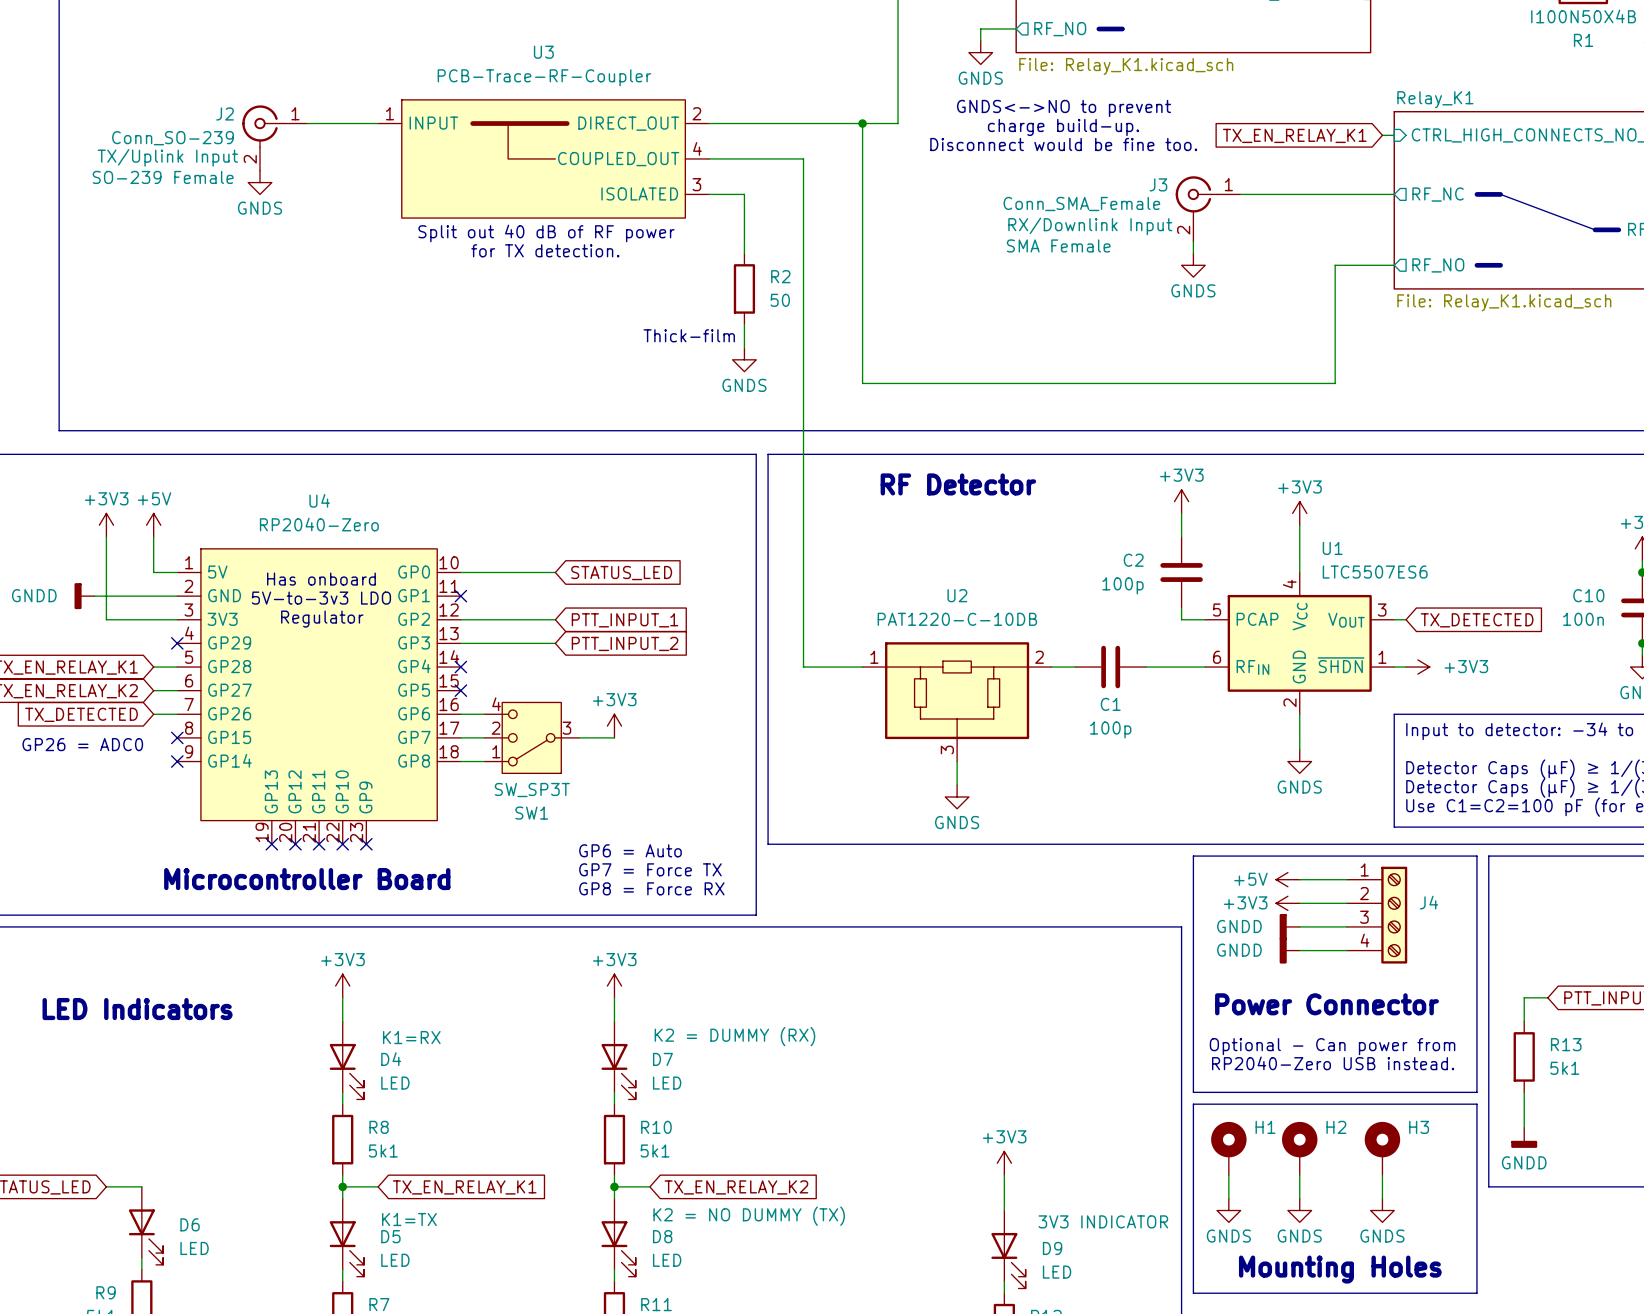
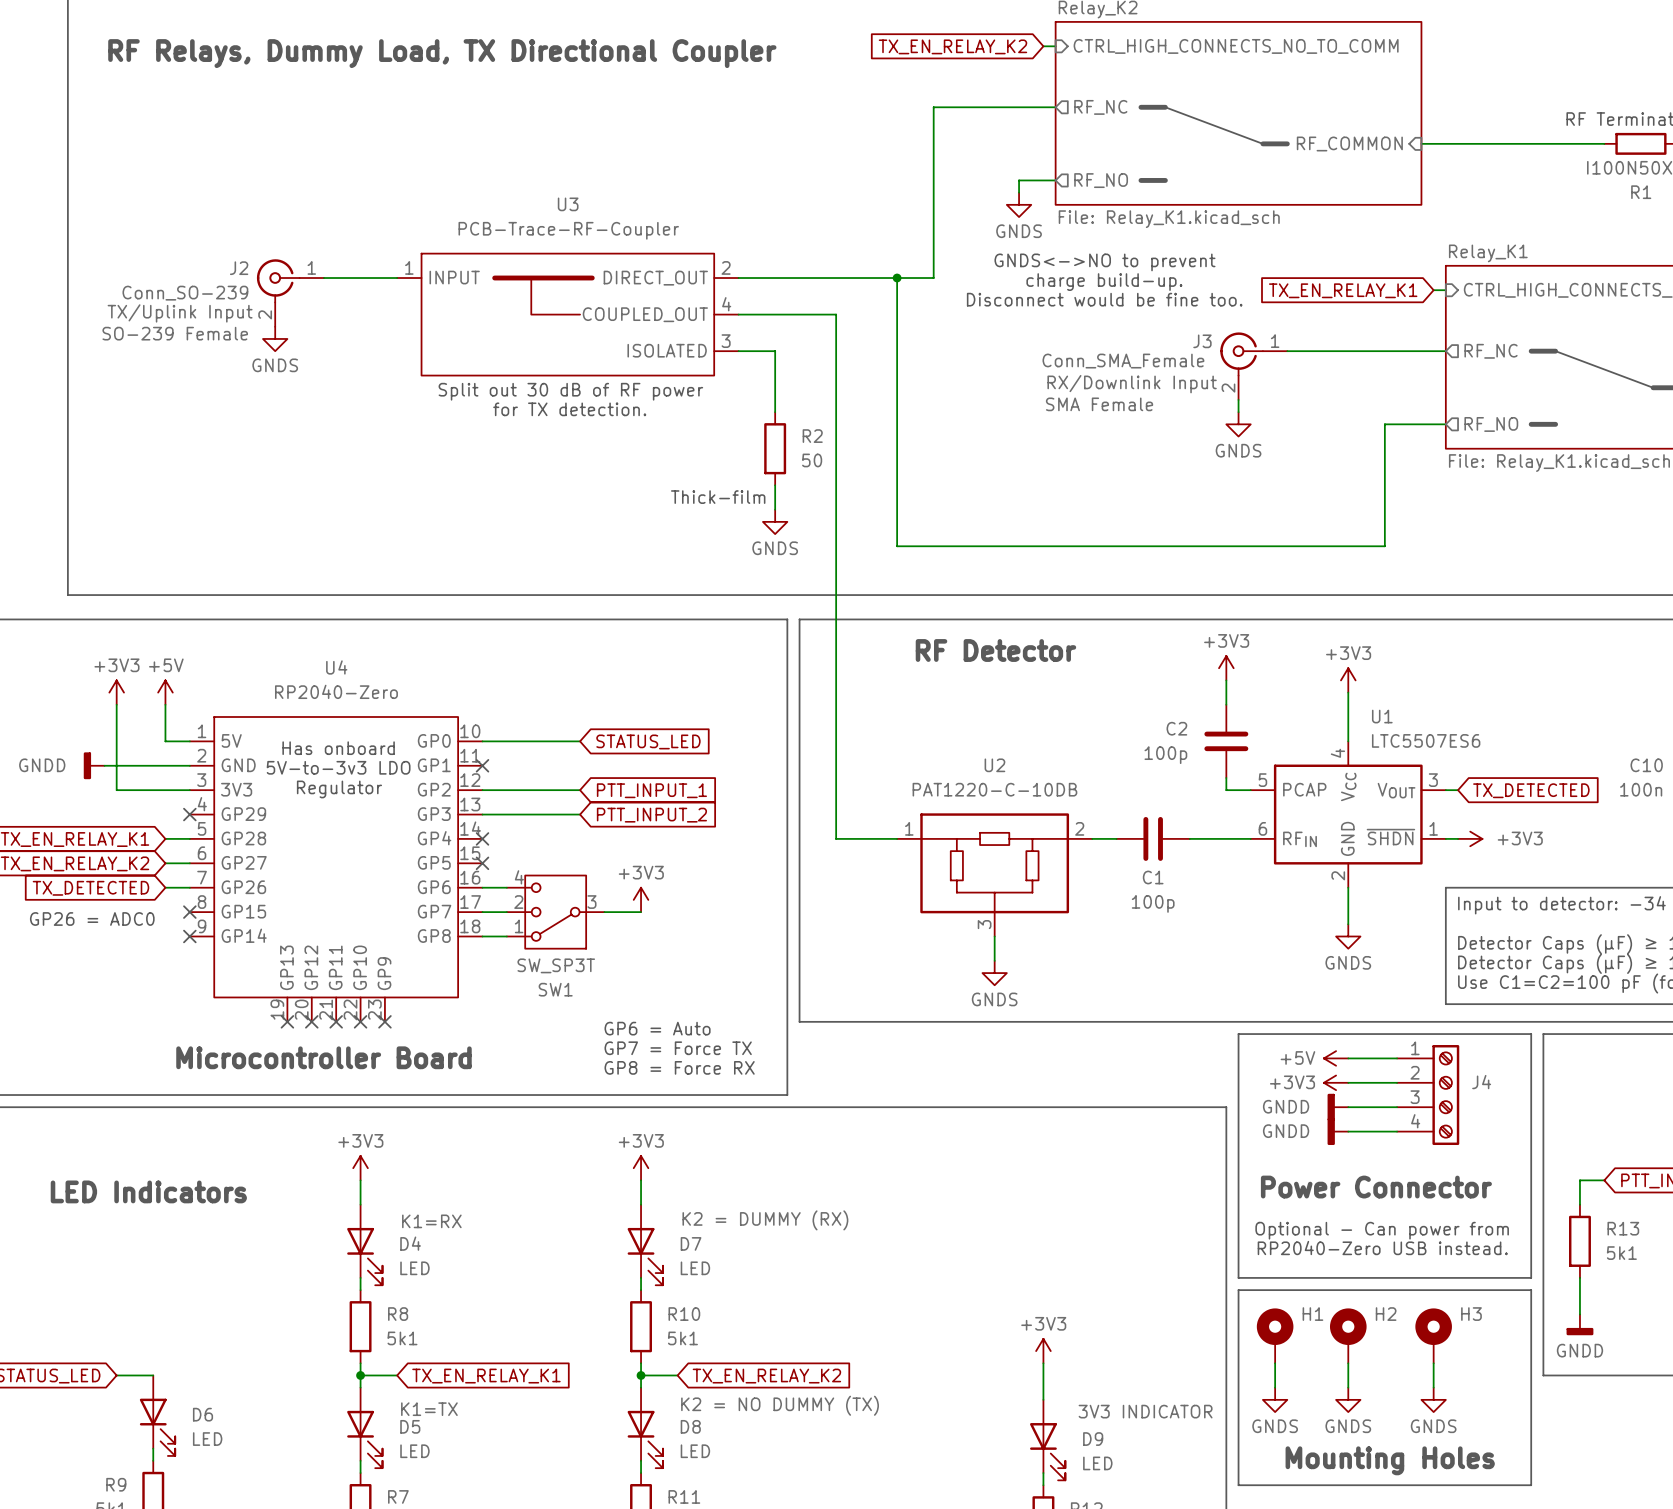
text: Split out 40 dB of RF power (546, 233) -> Split out 30 dB of RF power (570, 391)

